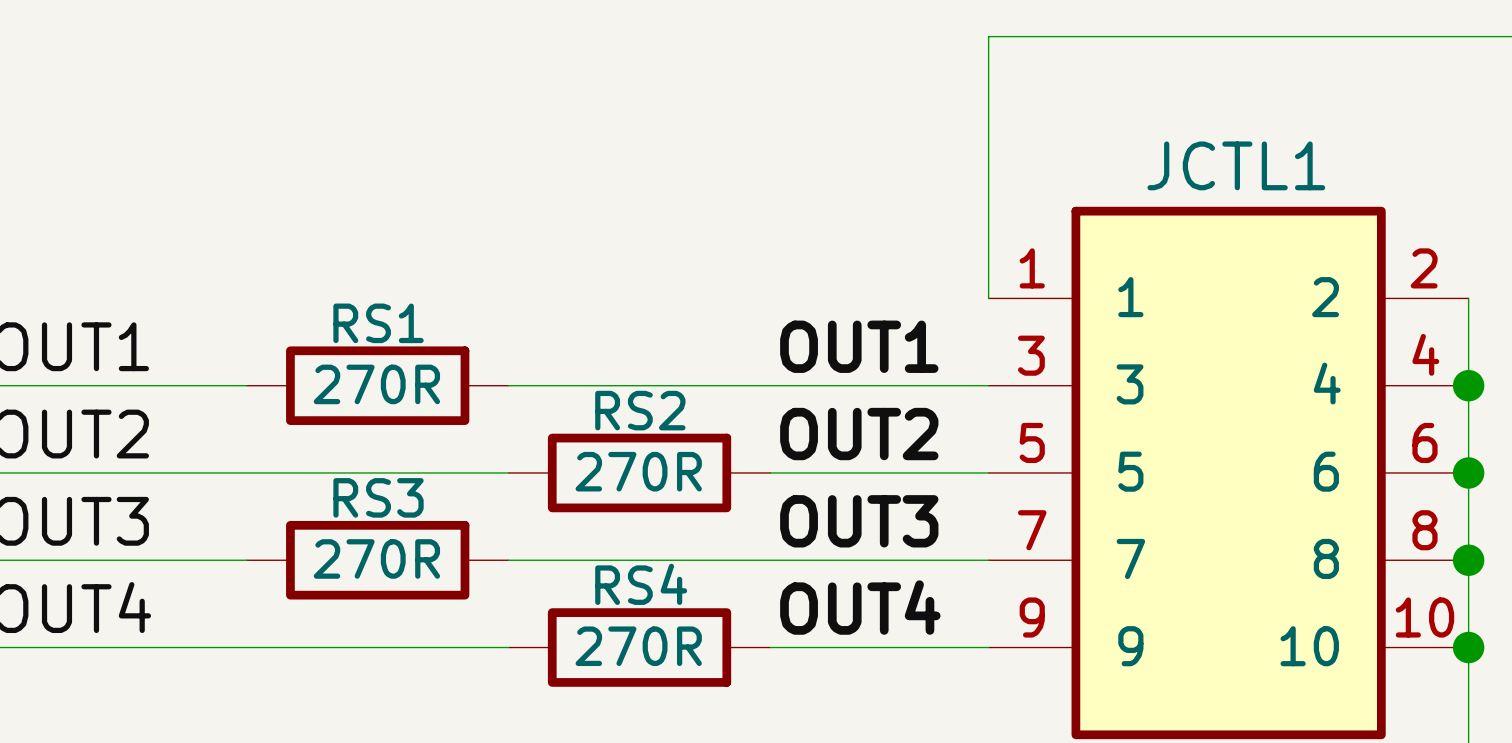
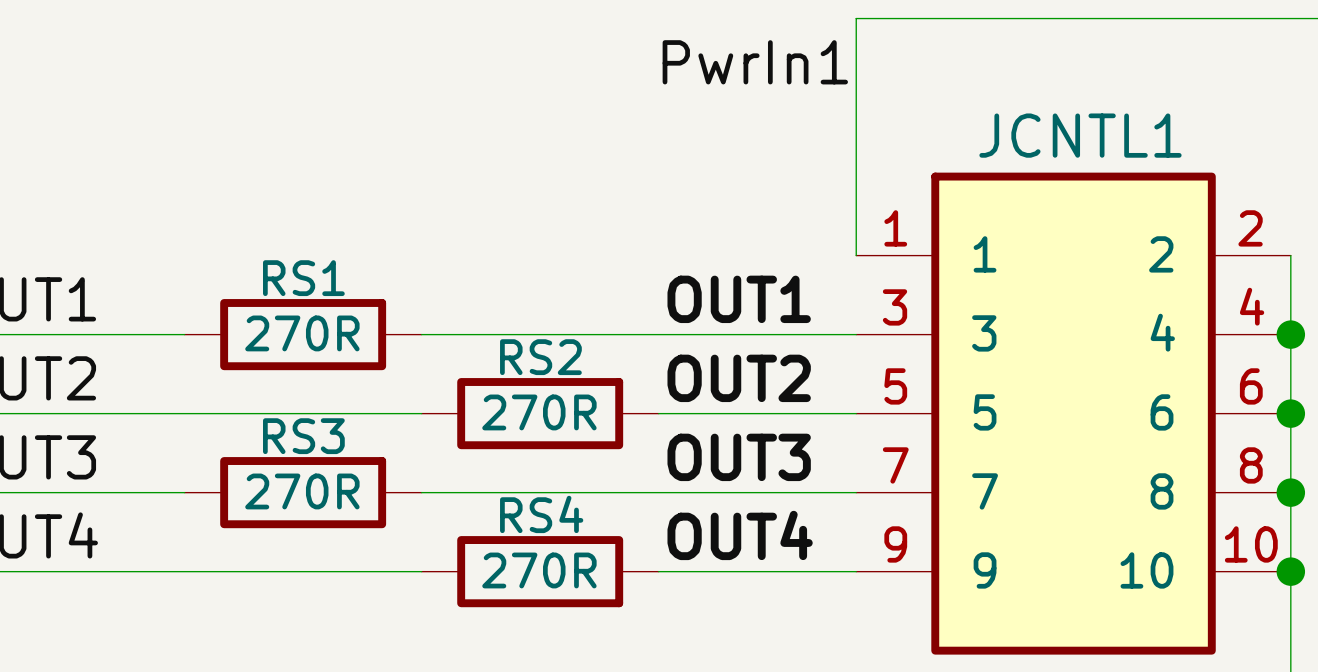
label: none -> PwrIn1 (755, 62)
JCTL1 name: JCTL1 (1236, 165) -> JCNTL1 (1080, 135)

